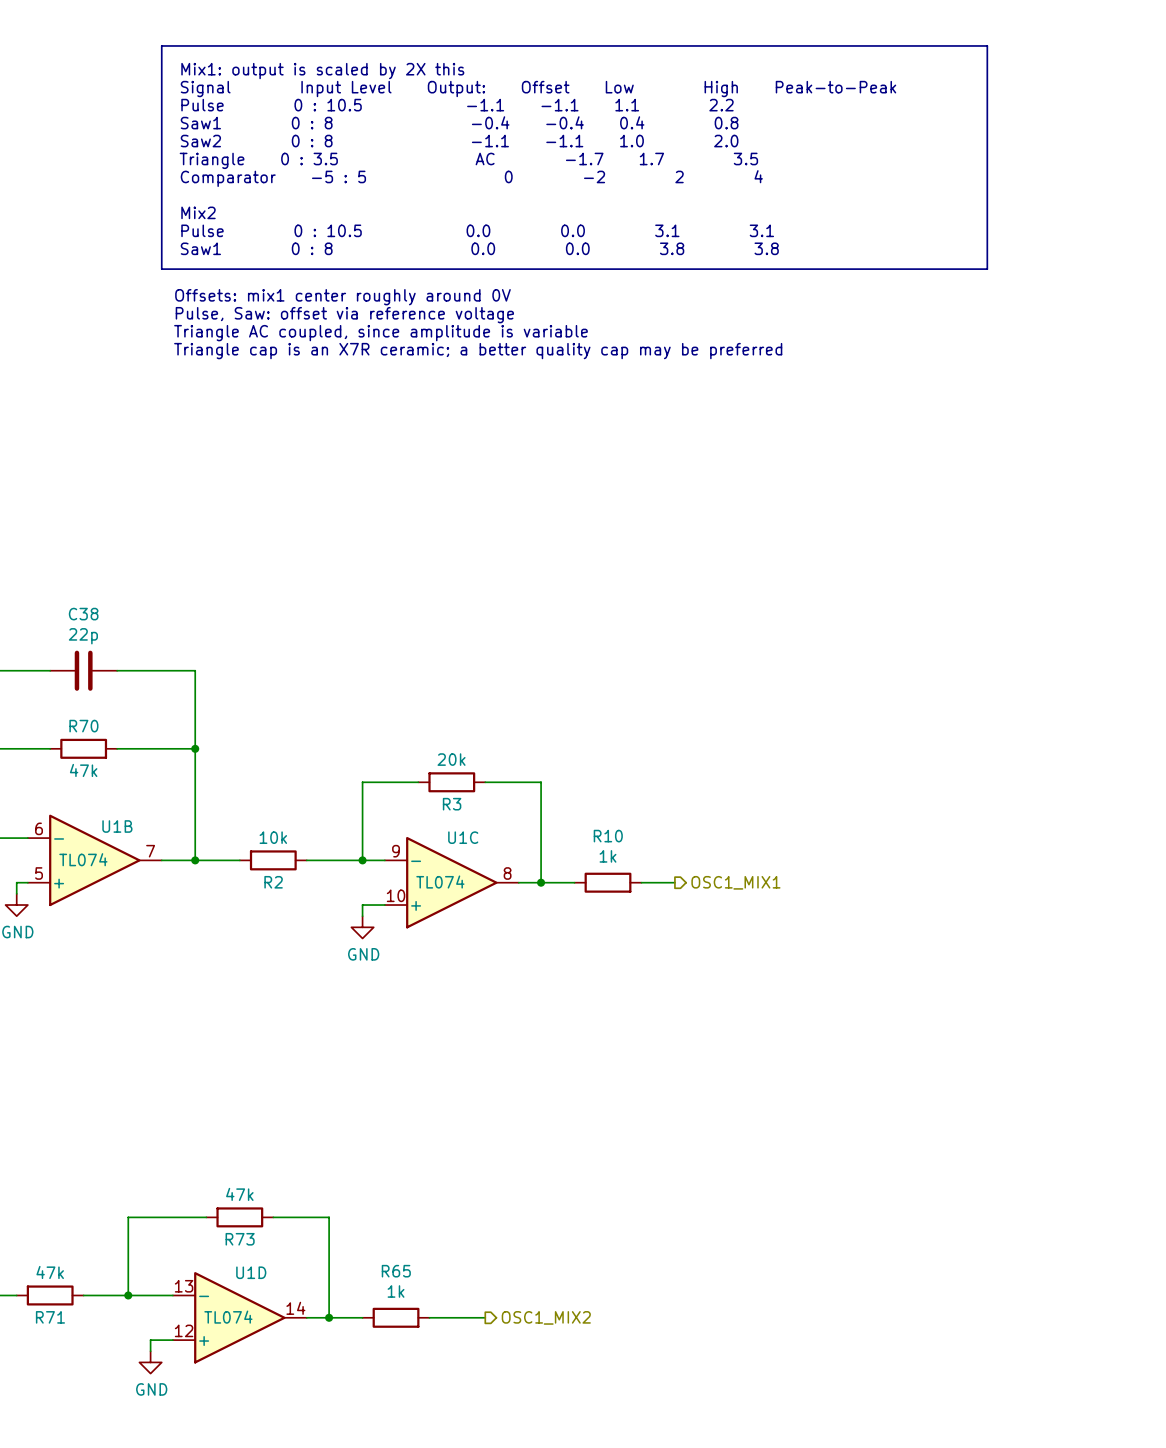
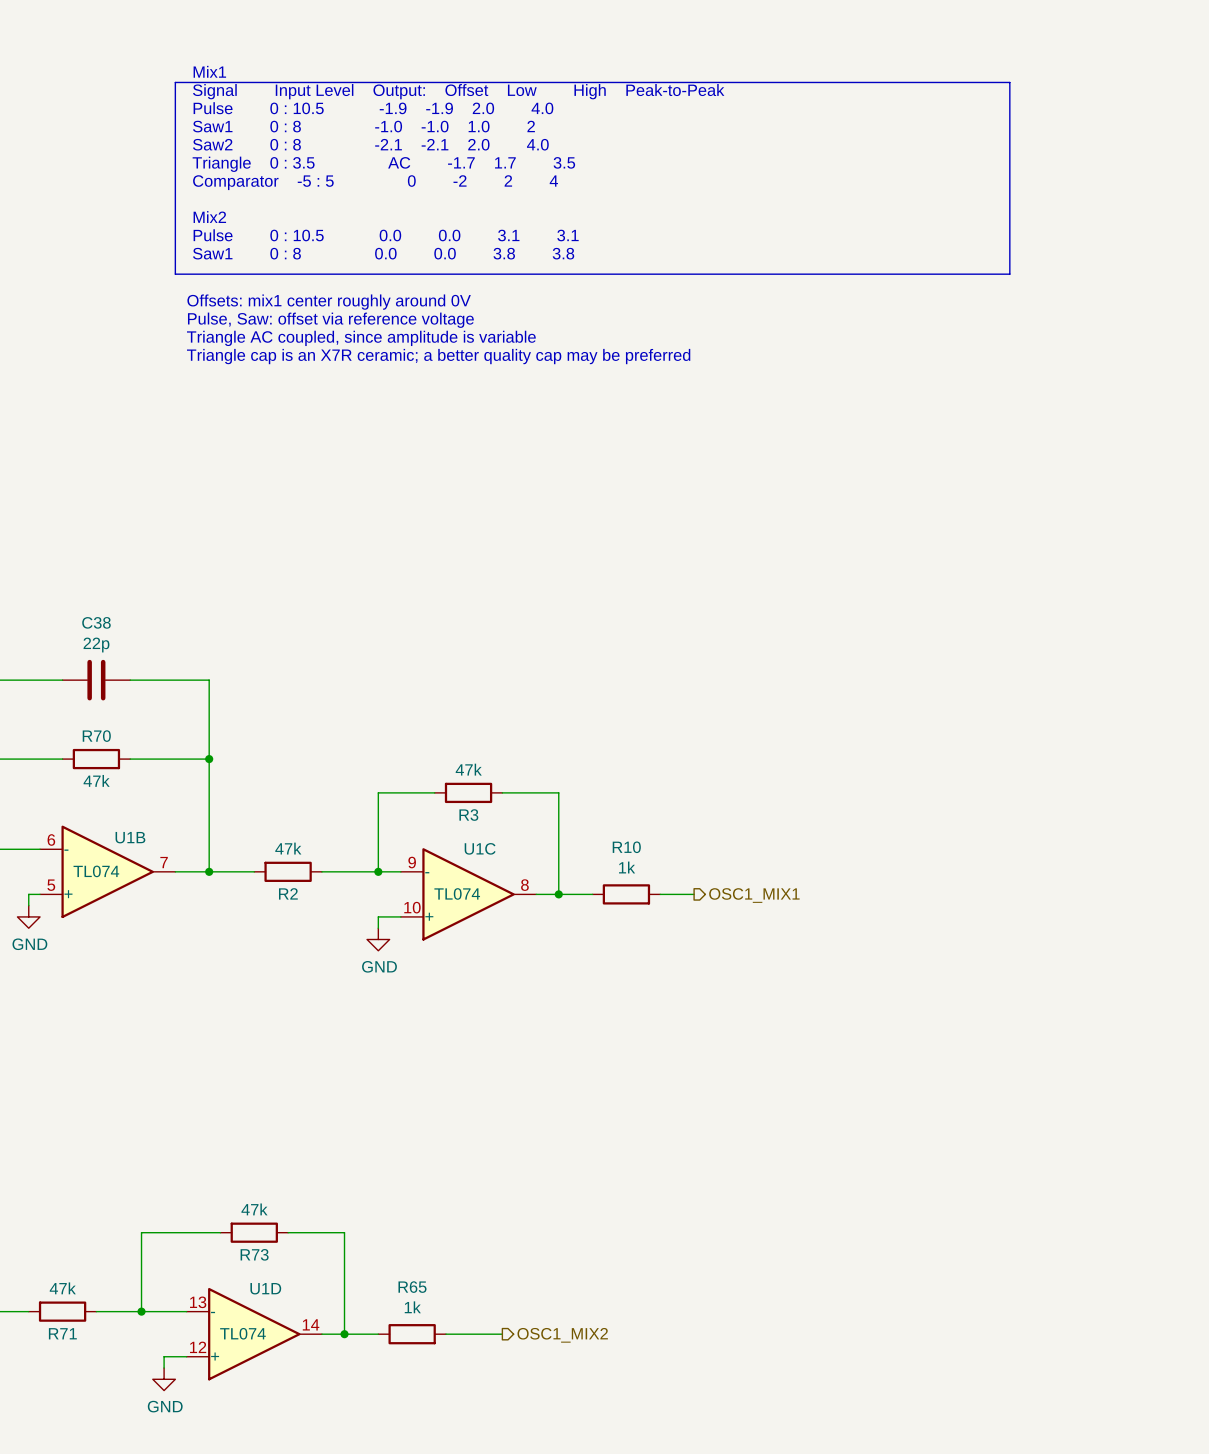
text: Mix1: output is scaled by 2X this (322, 71) -> Mix1 (209, 71)
line: (161, 79) (161, 45) (987, 45) (987, 79) -> (175, 82) (1009, 82)
text: Pulse 0 : 10.5 -1.1 -1.1 1.1 2.2 (457, 105) -> Pulse 0 : 10.5 -1.9 -1.9 2.0 4.0 (373, 108)
text: Saw1 0 : 8 -0.4 -0.4 0.4 0.8 (459, 122) -> Saw1 0 : 8 -1.0 -1.0 1.0 2 (363, 126)
text: Saw2 0 : 8 -1.1 -1.1 1.0 2.0 (459, 141) -> Saw2 0 : 8 -2.1 -2.1 2.0 4.0 (370, 144)
R3 value: 20k (451, 759) -> 47k (468, 769)
R2 value: 10k (273, 837) -> 47k (288, 848)

